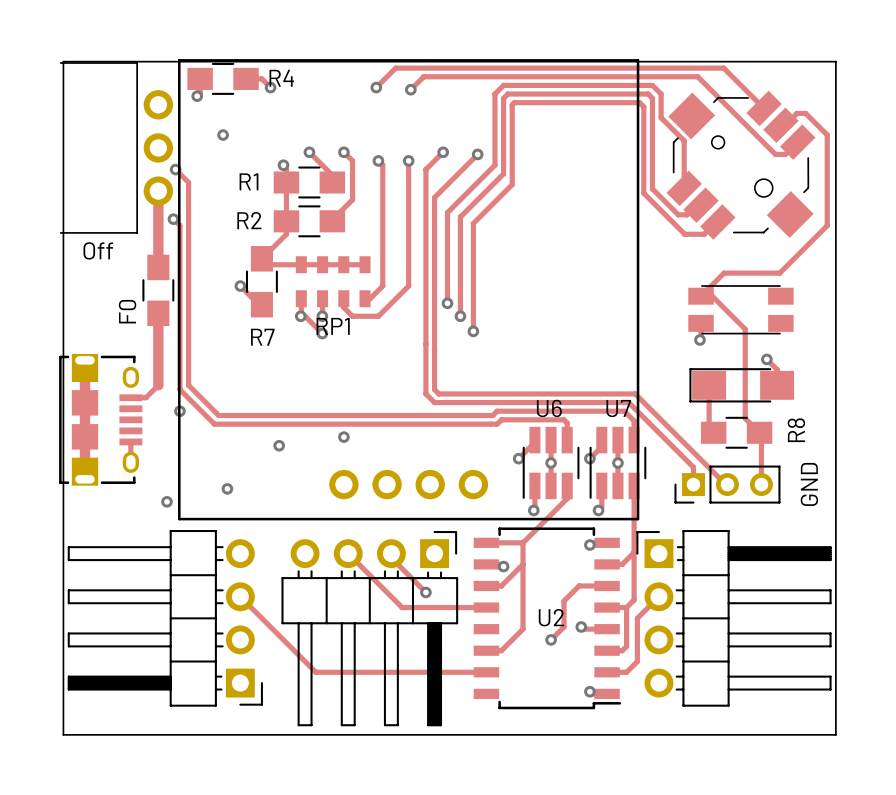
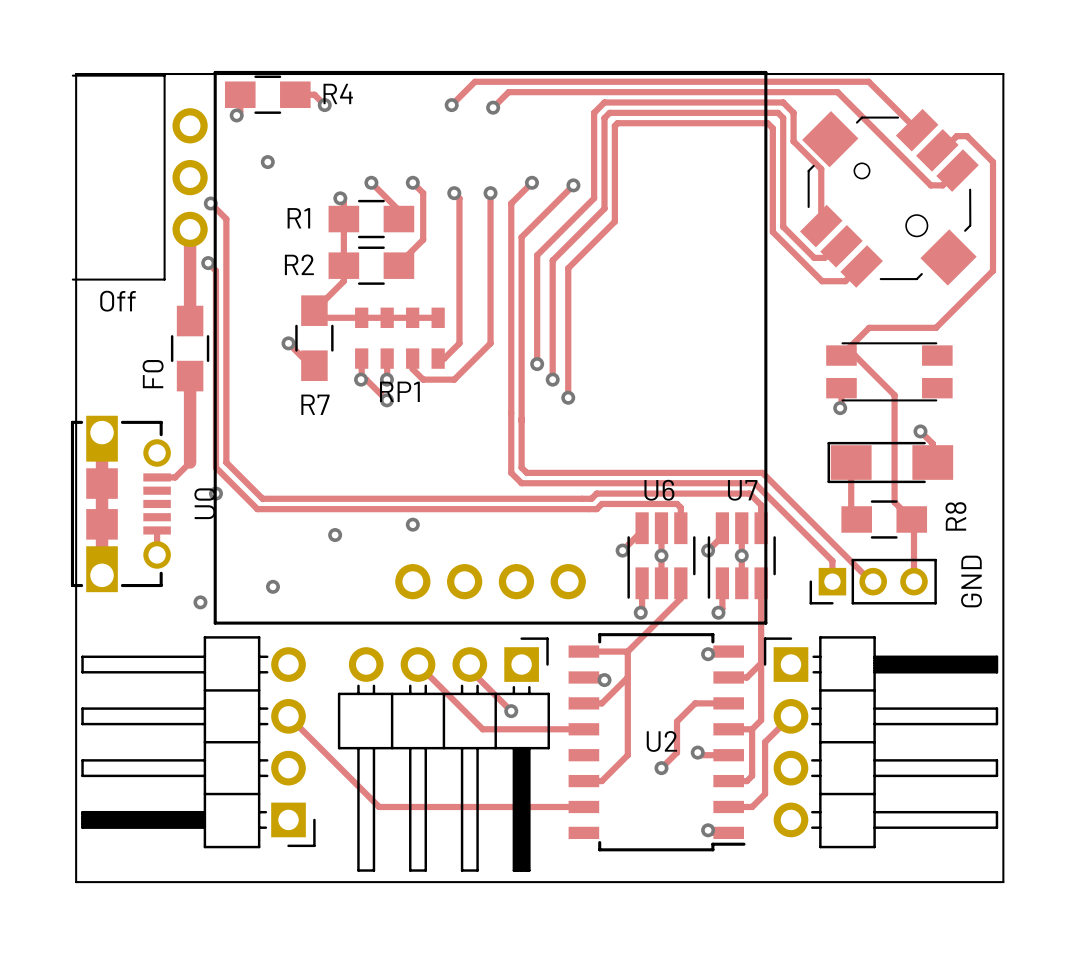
part: (100, 419) -> none
U0: none -> (120, 503)

